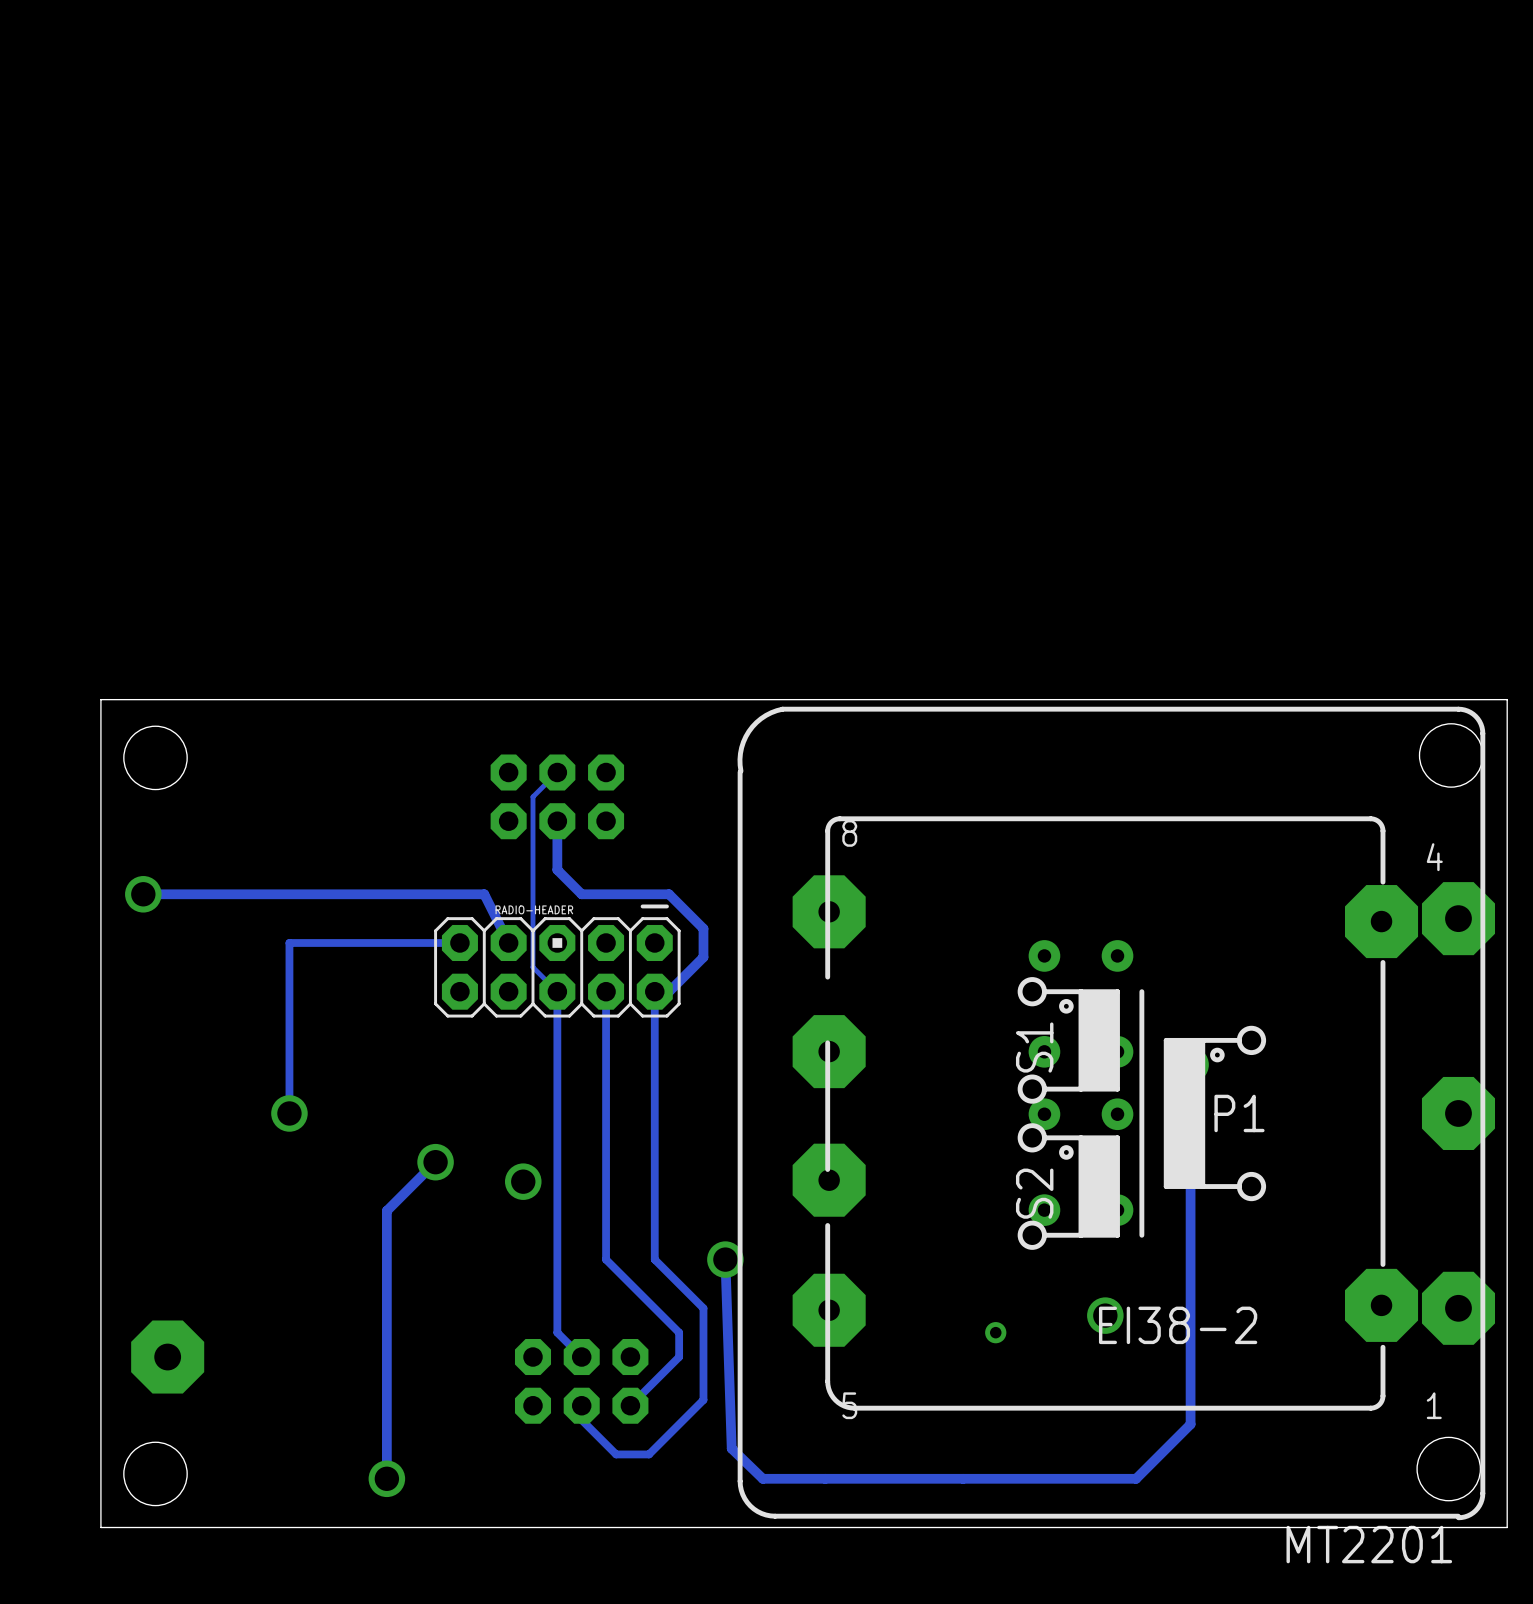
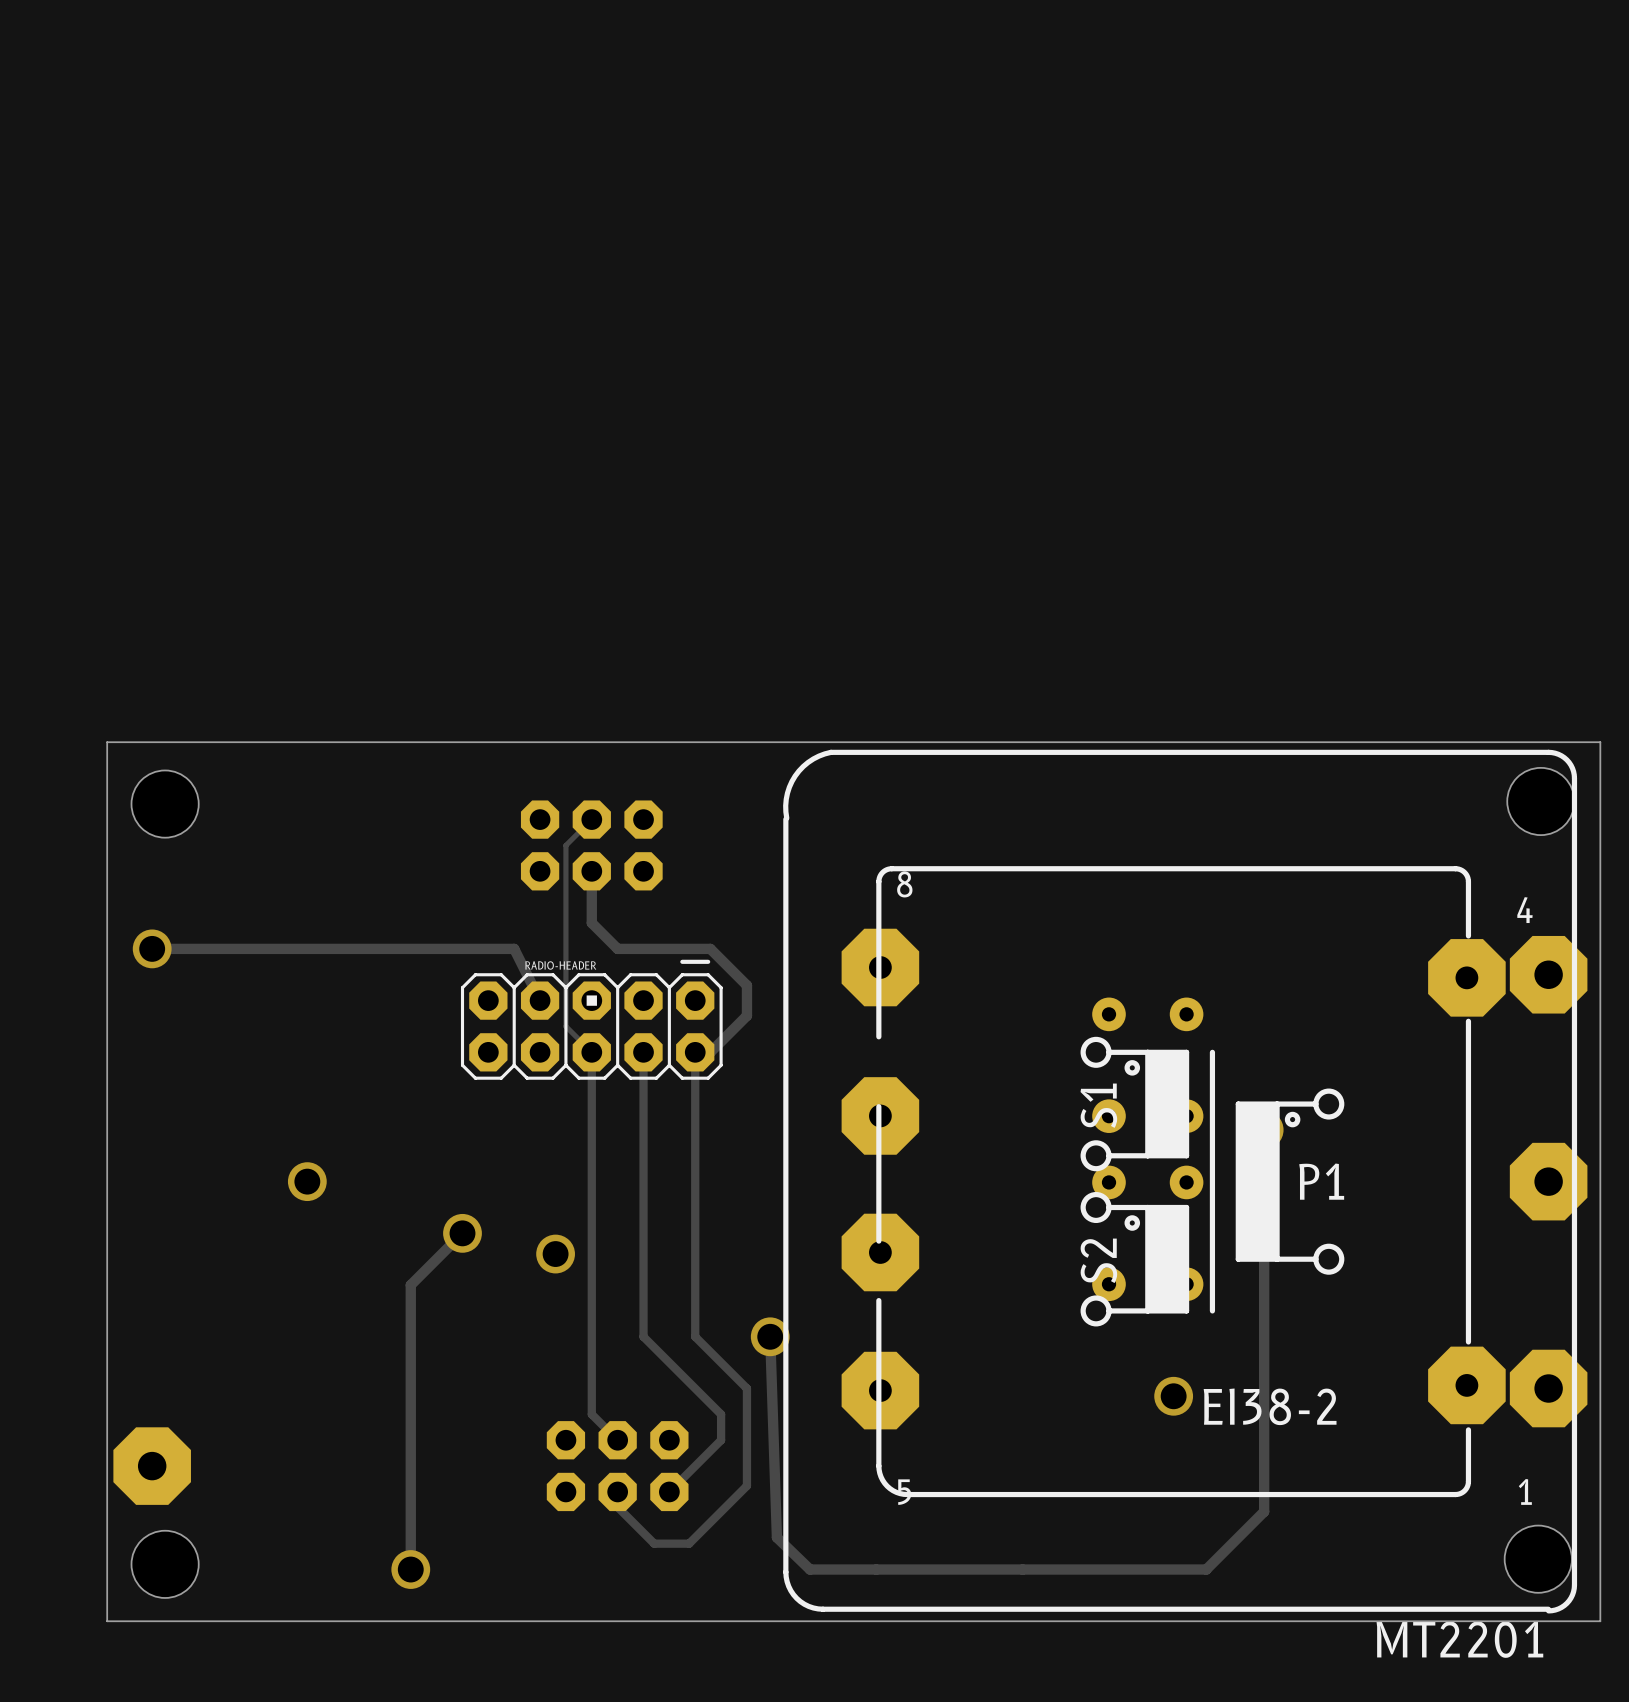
track: (459, 942) (289, 942) (289, 1113) -> none
via: (995, 1332) -> none
part position: (167, 1357) -> (152, 1466)

